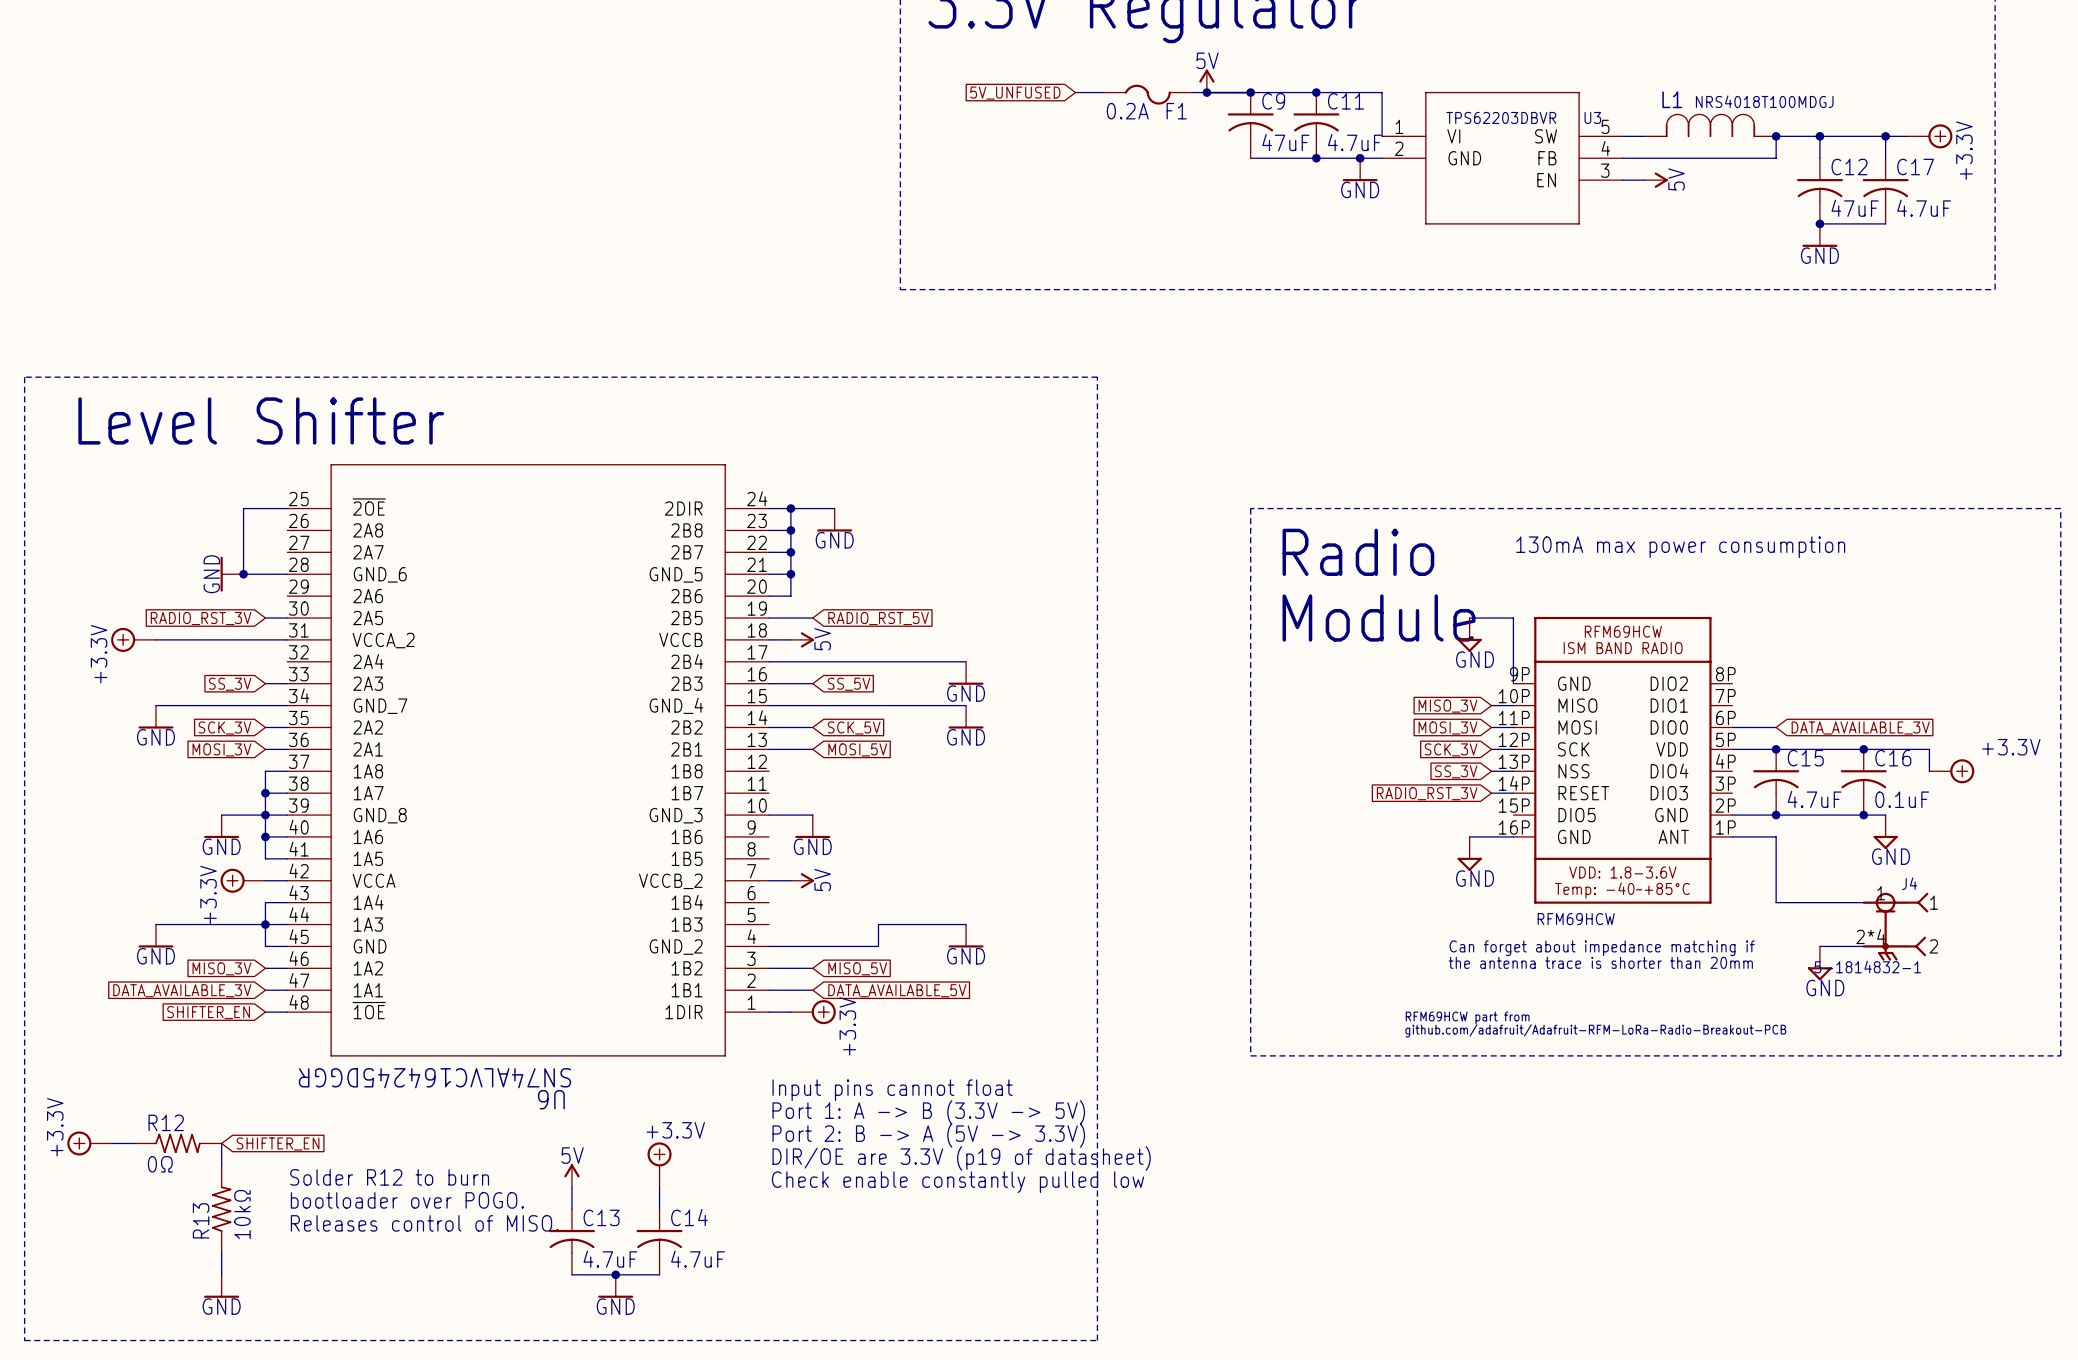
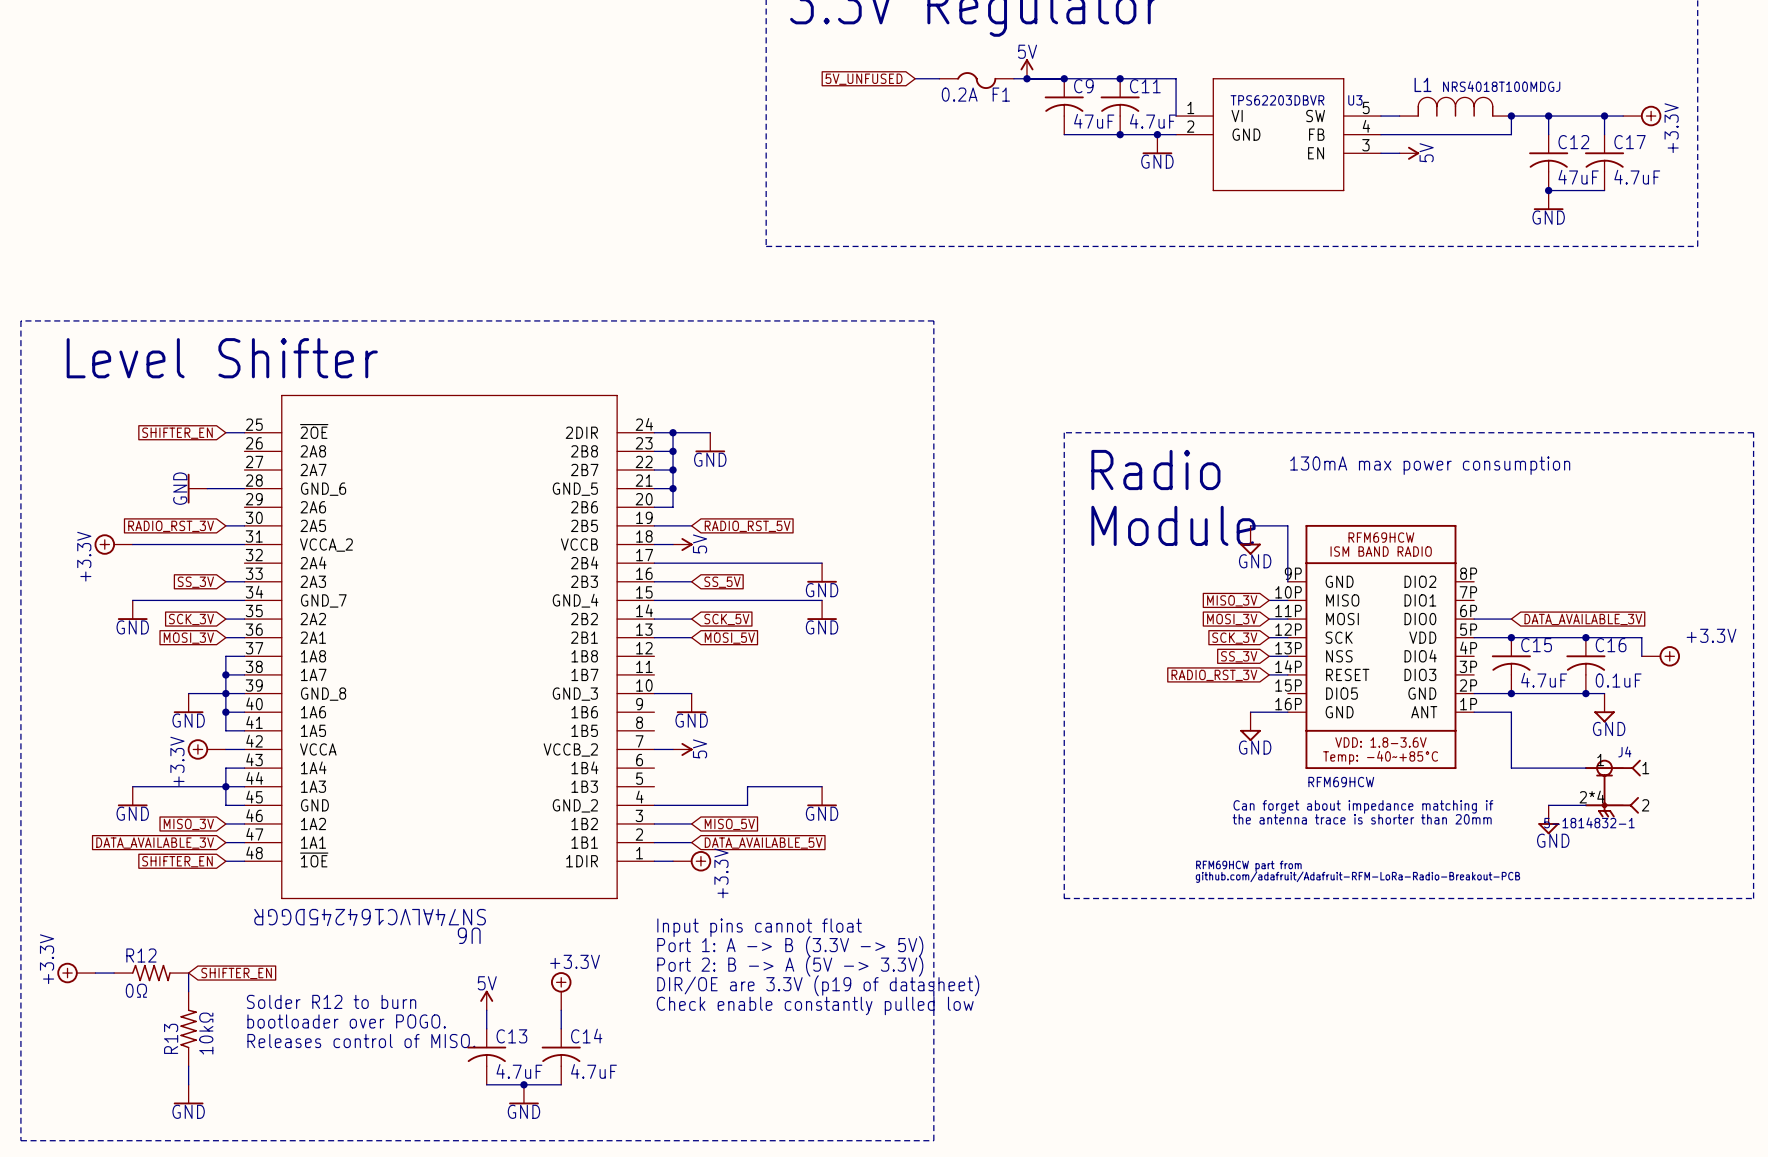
wire: (265, 508) (243, 508) (243, 574) -> none
global label: none -> SHIFTER_EN (177, 433)
junction: (243, 574) -> none

